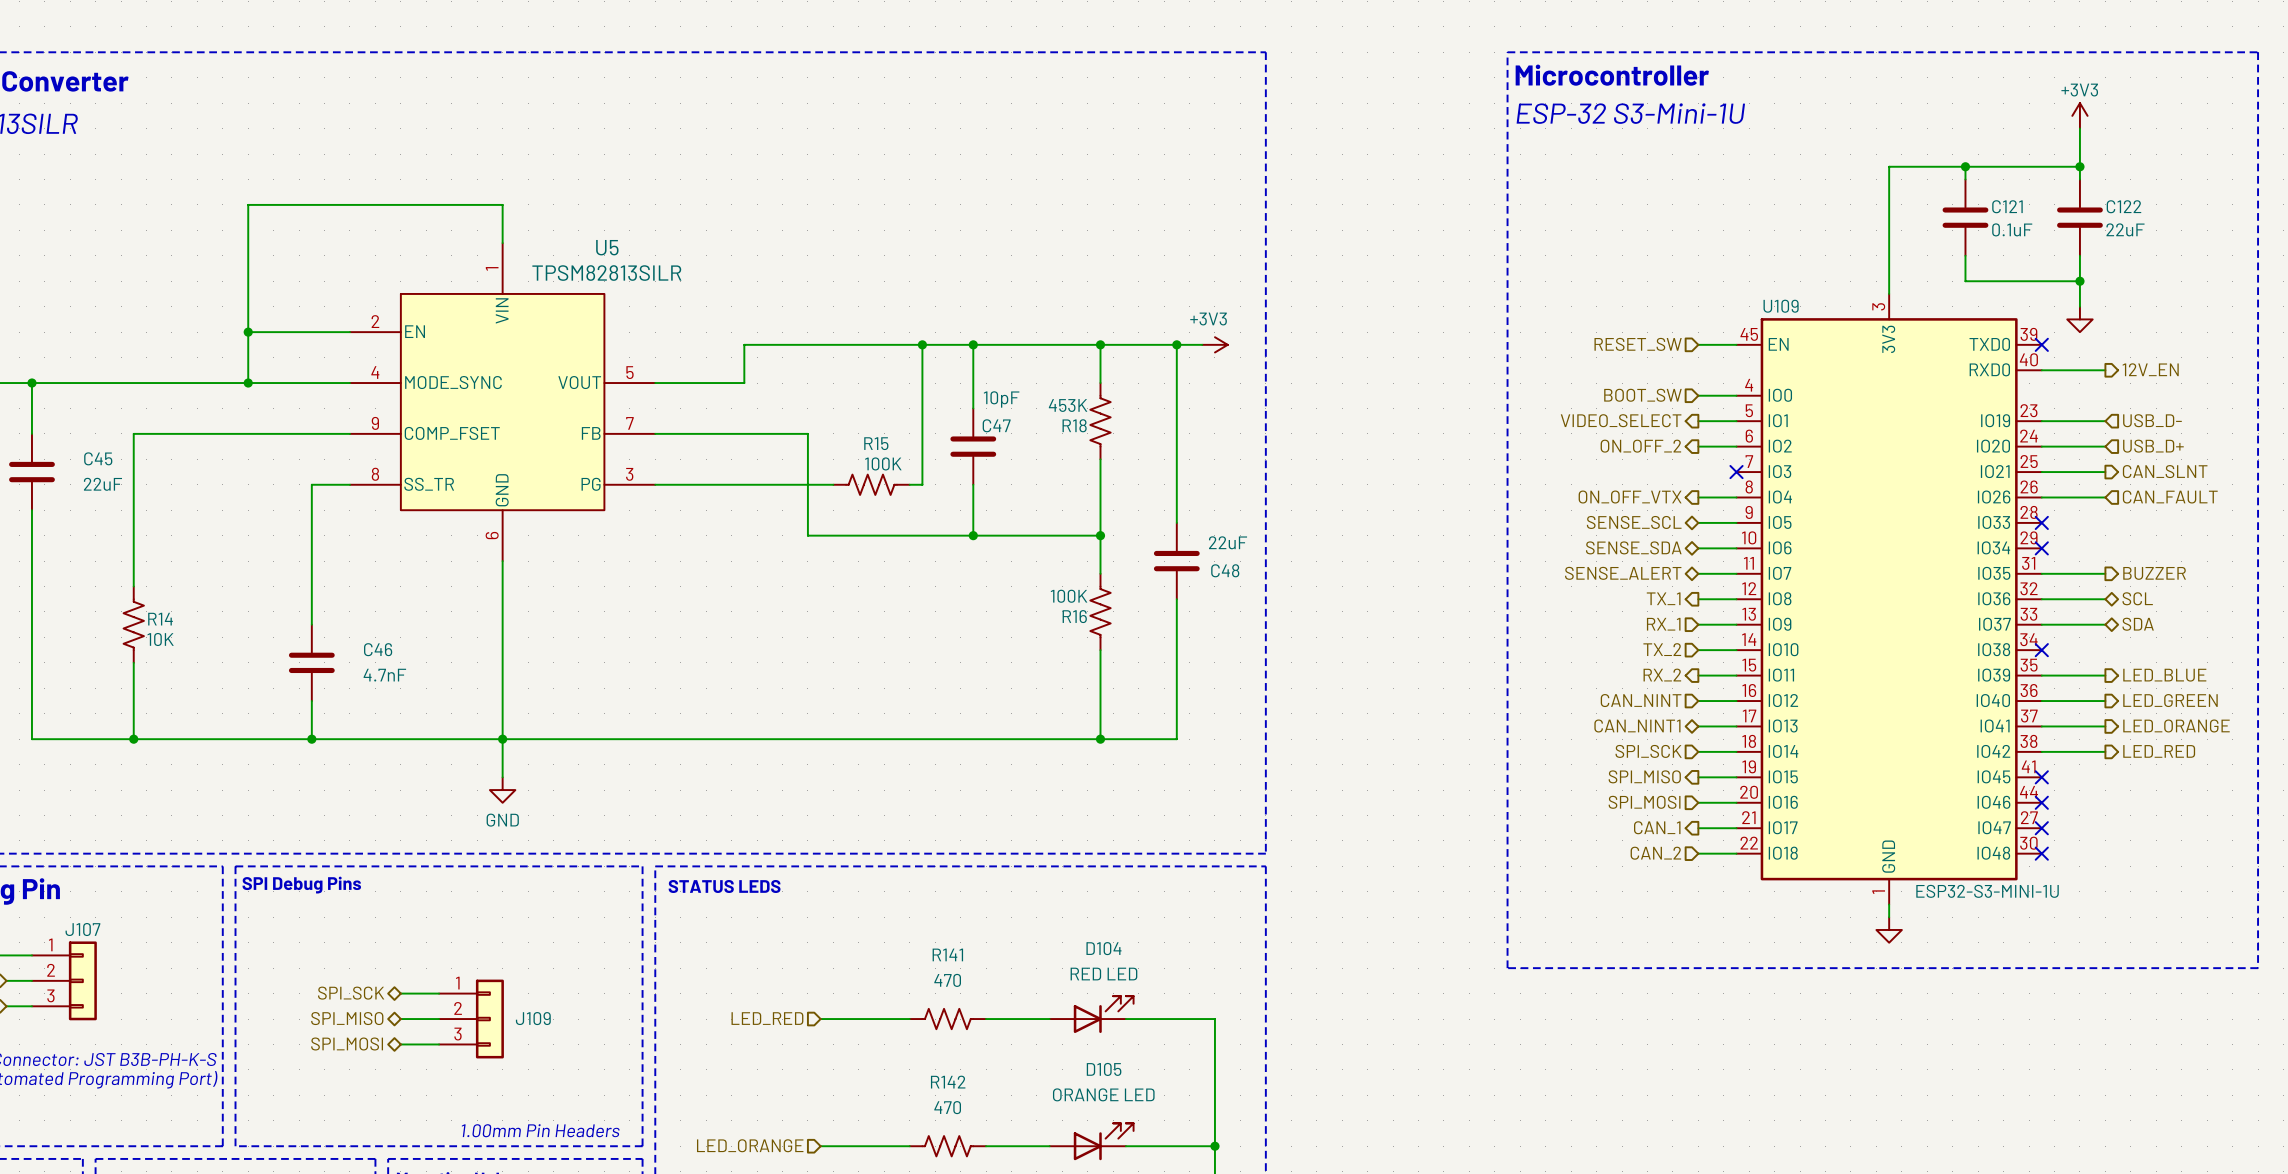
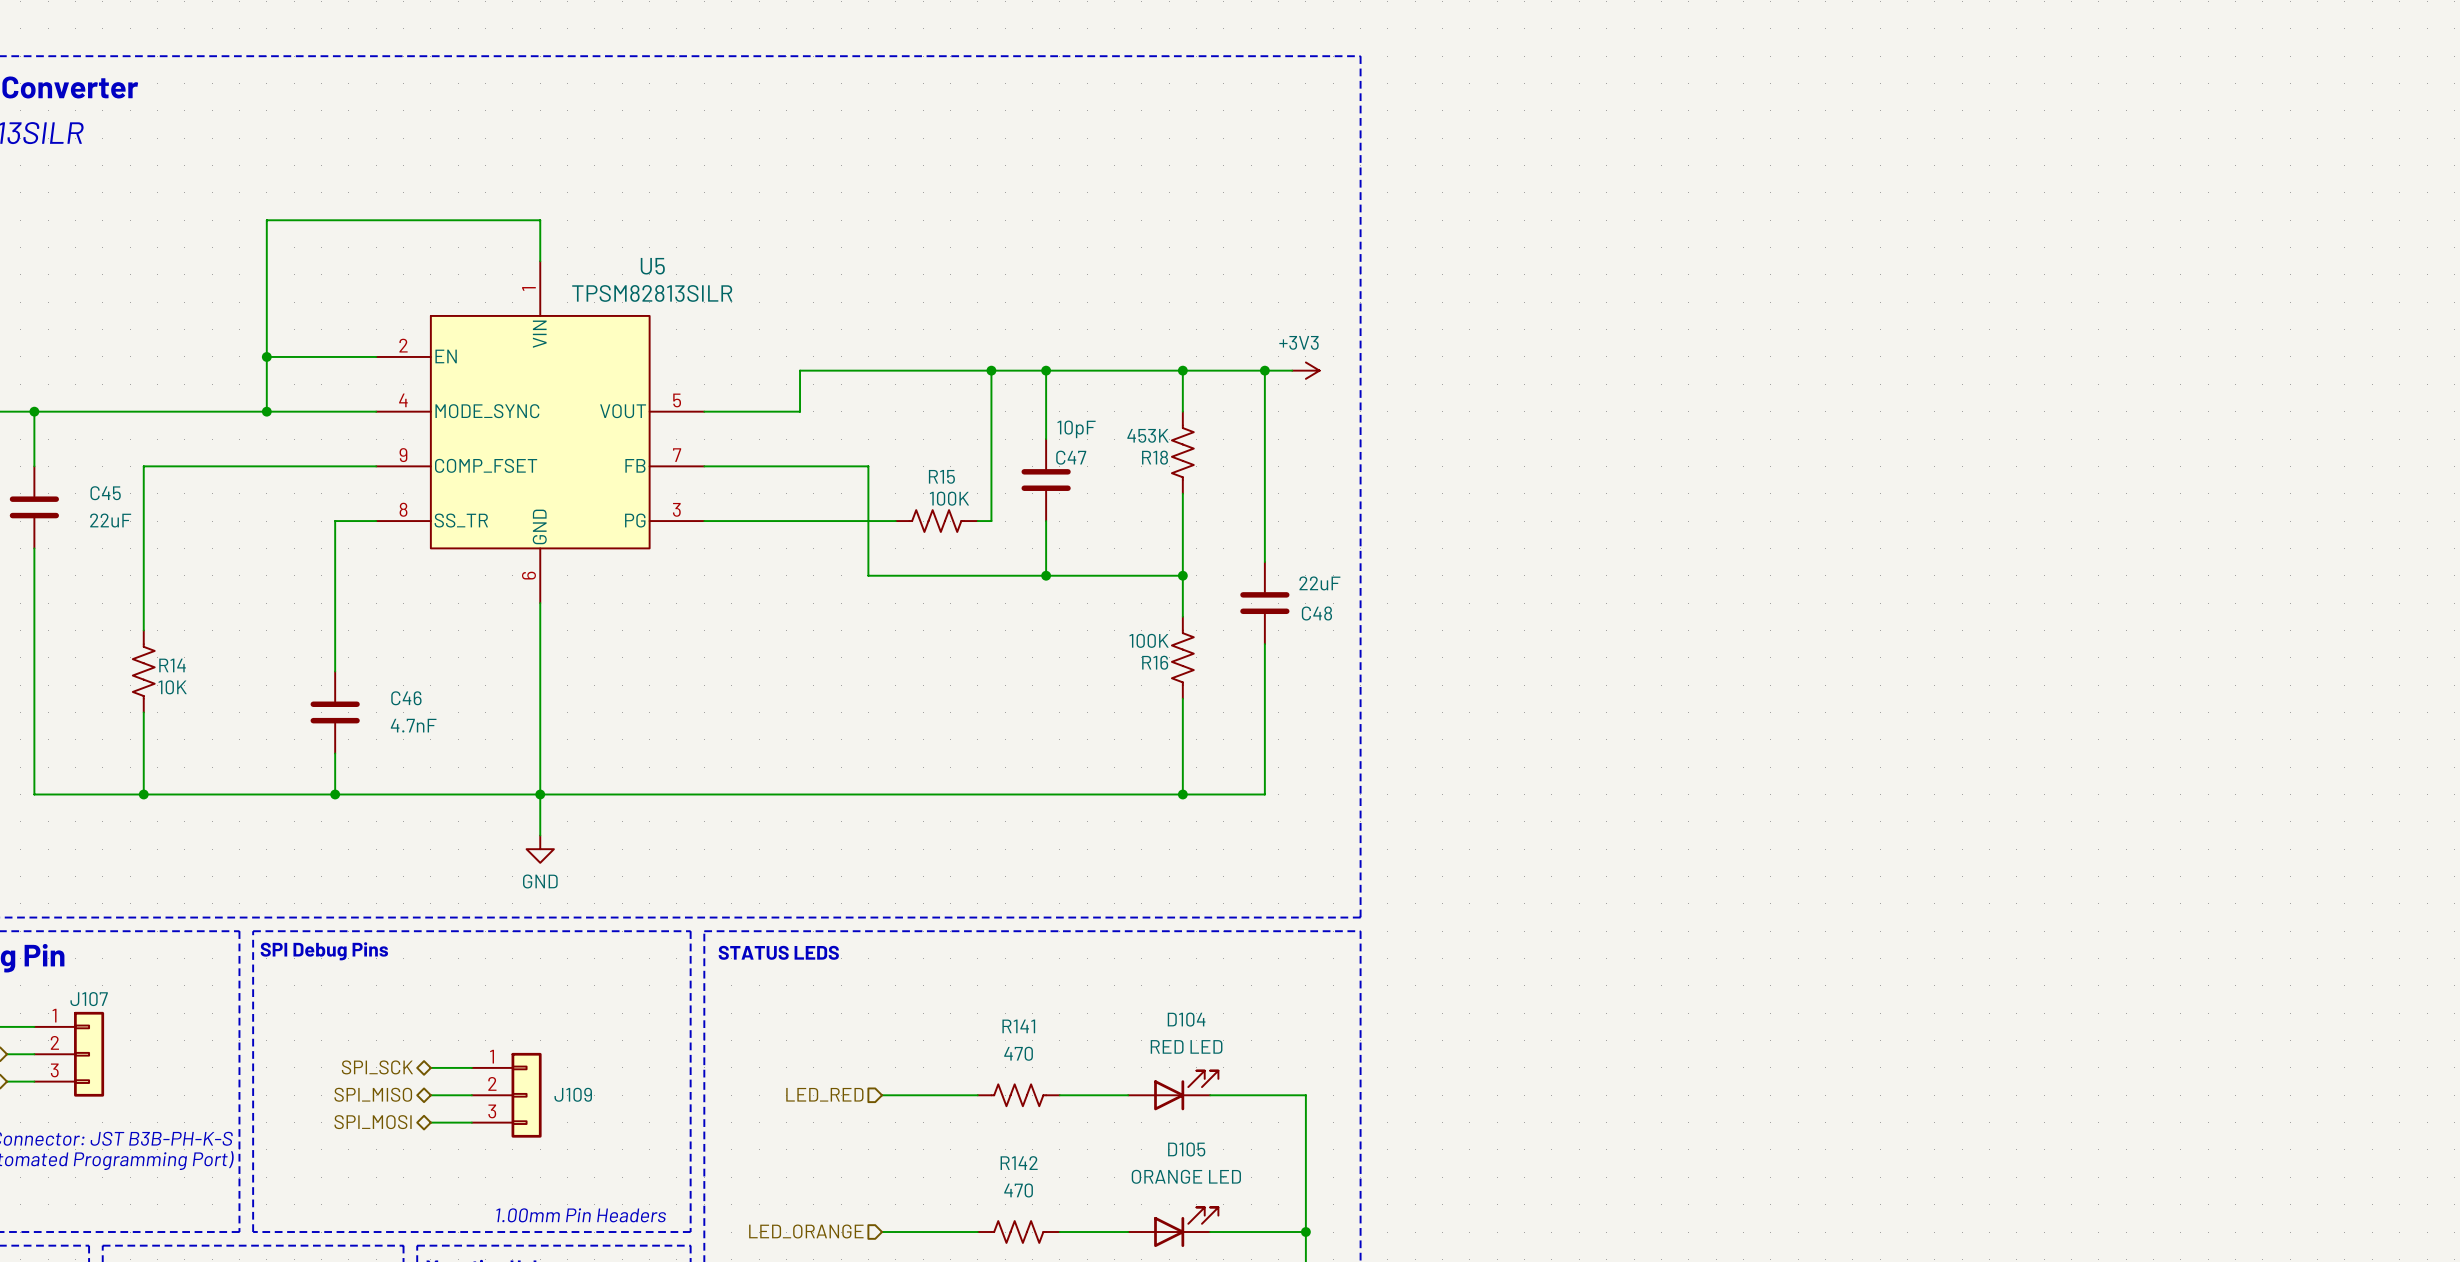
line: (1507, 52) (2258, 52) (2258, 968) (1507, 968) (1507, 52) -> none
text: Microcontroller (1612, 75) -> none
text: ESP-32 S3-Mini-1U (1630, 113) -> none
power symbol: +3V3 (2079, 115) -> none
wire: (2079, 128) (2079, 179) -> none
wire: (1965, 166) (1965, 179) -> none
junction: (1965, 166) -> none
wire: (2079, 166) (1889, 166) (1889, 293) -> none
junction: (2079, 166) -> none
C121: 0.1uF (1965, 217) -> none
C122: 22uF (2079, 217) -> none
wire: (1965, 255) (1965, 281) (2079, 281) -> none
wire: (2079, 255) (2079, 306) -> none
junction: (2079, 281) -> none
power symbol: (2079, 319) -> none
hierarchical label: RESET_SW (1638, 344) -> none
wire: (1698, 344) (1736, 344) -> none
no-connect mark: (2041, 344) -> none
hierarchical label: 12V_EN (2150, 369) -> none
wire: (2041, 370) (2105, 370) -> none
hierarchical label: BOOT_SW (1642, 395) -> none
wire: (1698, 395) (1736, 395) -> none
hierarchical label: VIDEO_SELECT (1621, 420) -> none
hierarchical label: USB_D- (2152, 420) -> none
wire: (1698, 421) (1736, 421) -> none
wire: (2041, 421) (2105, 421) -> none
hierarchical label: ON_OFF_2 (1640, 446) -> none
wire: (1698, 446) (1736, 446) -> none
wire: (2041, 446) (2105, 446) -> none
hierarchical label: USB_D+ (2153, 446) -> none
hierarchical label: CAN_SLNT (2165, 471) -> none
no-connect mark: (1736, 472) -> none
wire: (2041, 472) (2105, 472) -> none
hierarchical label: ON_OFF_VTX (1630, 497) -> none
wire: (1698, 497) (1736, 497) -> none
wire: (2041, 497) (2105, 497) -> none
hierarchical label: CAN_FAULT (2170, 497) -> none
hierarchical label: SENSE_SCL (1634, 522) -> none
wire: (1698, 522) (1736, 522) -> none
no-connect mark: (2041, 522) -> none
hierarchical label: SENSE_SDA (1633, 547) -> none
wire: (1698, 548) (1736, 548) -> none
no-connect mark: (2041, 548) -> none
hierarchical label: SENSE_ALERT (1623, 573) -> none
wire: (1698, 573) (1736, 573) -> none
wire: (2041, 573) (2105, 573) -> none
hierarchical label: BUZZER (2154, 573) -> none
hierarchical label: TX_1 (1663, 598) -> none
hierarchical label: SCL (2137, 598) -> none
wire: (1698, 599) (1736, 599) -> none
U109: ESP32-S3-MINI-1U (1889, 599) -> none
wire: (2041, 599) (2105, 599) -> none
hierarchical label: RX_1 (1663, 624) -> none
wire: (1698, 624) (1736, 624) -> none
wire: (2041, 624) (2105, 624) -> none
hierarchical label: SDA (2138, 624) -> none
hierarchical label: TX_2 (1662, 649) -> none
wire: (1698, 650) (1736, 650) -> none
no-connect mark: (2041, 650) -> none
hierarchical label: RX_2 (1662, 675) -> none
wire: (1698, 675) (1736, 675) -> none
wire: (2041, 675) (2105, 675) -> none
hierarchical label: LED_BLUE (2164, 675) -> none
hierarchical label: CAN_NINT (1641, 700) -> none
hierarchical label: LED_GREEN (2170, 700) -> none
wire: (1698, 701) (1736, 701) -> none
wire: (2041, 701) (2105, 701) -> none
hierarchical label: CAN_NINT1 (1637, 725) -> none
hierarchical label: LED_ORANGE (2176, 725) -> none
wire: (1698, 726) (1736, 726) -> none
wire: (2041, 726) (2105, 726) -> none
hierarchical label: SPI_SCK (1648, 751) -> none
wire: (1698, 751) (1736, 751) -> none
wire: (2041, 751) (2105, 751) -> none
hierarchical label: LED_RED (2159, 751) -> none
hierarchical label: SPI_MISO (1644, 776) -> none
wire: (1698, 777) (1736, 777) -> none
no-connect mark: (2041, 777) -> none
hierarchical label: SPI_MOSI (1644, 802) -> none
wire: (1698, 802) (1736, 802) -> none
no-connect mark: (2041, 802) -> none
hierarchical label: CAN_1 (1657, 827) -> none
wire: (1698, 828) (1736, 828) -> none
no-connect mark: (2041, 828) -> none
hierarchical label: CAN_2 (1655, 853) -> none
wire: (1698, 853) (1736, 853) -> none
no-connect mark: (2041, 853) -> none
wire: (1889, 904) (1889, 917) -> none
power symbol: (1889, 929) -> none

